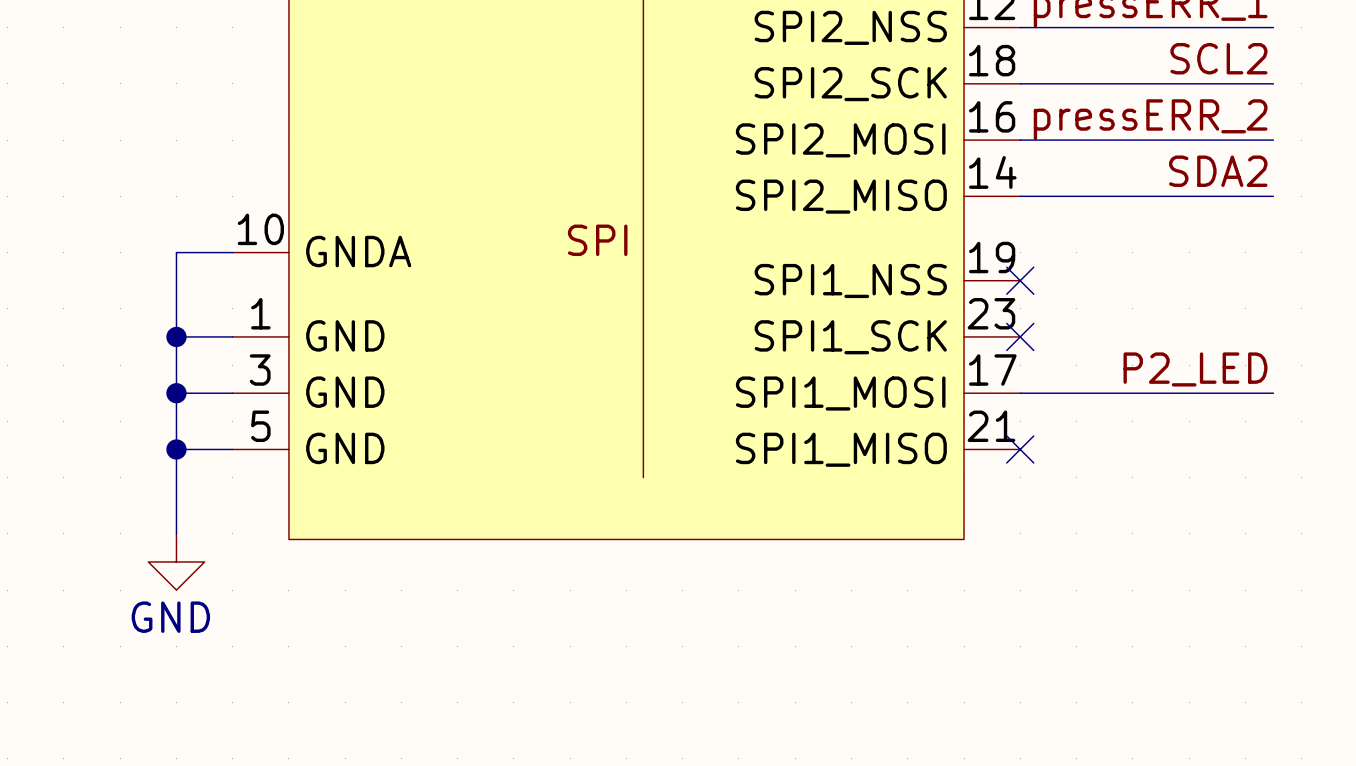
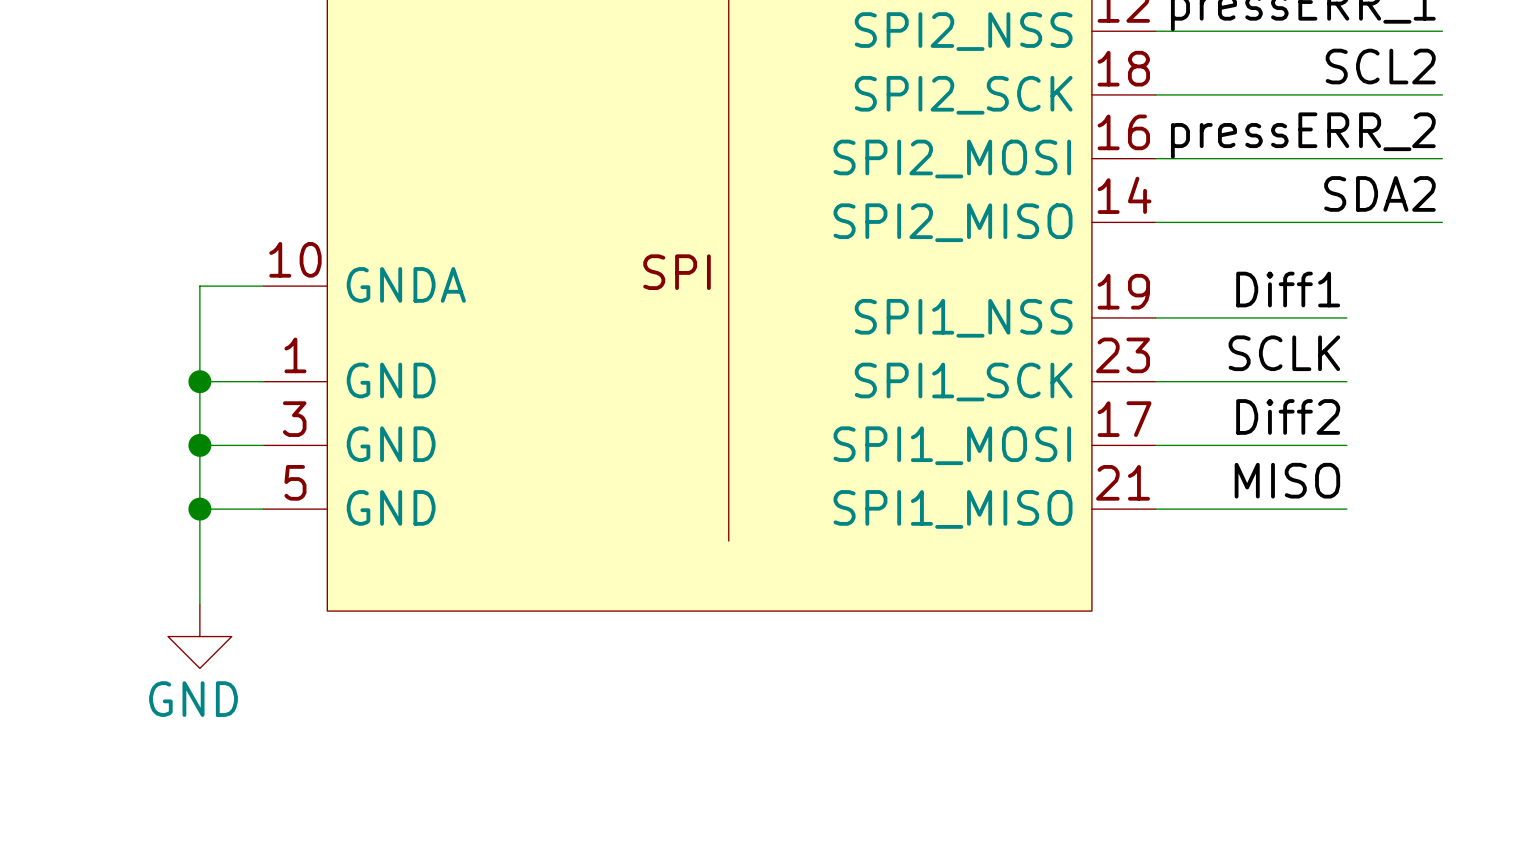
label: none -> Diff1 (1288, 289)
wire: none -> (1155, 317) (1346, 317)
no-connect mark: (1020, 280) -> none
label: none -> SCLK (1284, 353)
wire: none -> (1155, 381) (1346, 381)
no-connect mark: (1020, 336) -> none
label: none -> Diff2 (1288, 416)
label: P2_LED (1195, 369) -> none
wire: (1189, 393) (1273, 393) -> none
label: none -> MISO (1287, 480)
wire: none -> (1155, 509) (1346, 509)
no-connect mark: (1020, 449) -> none

